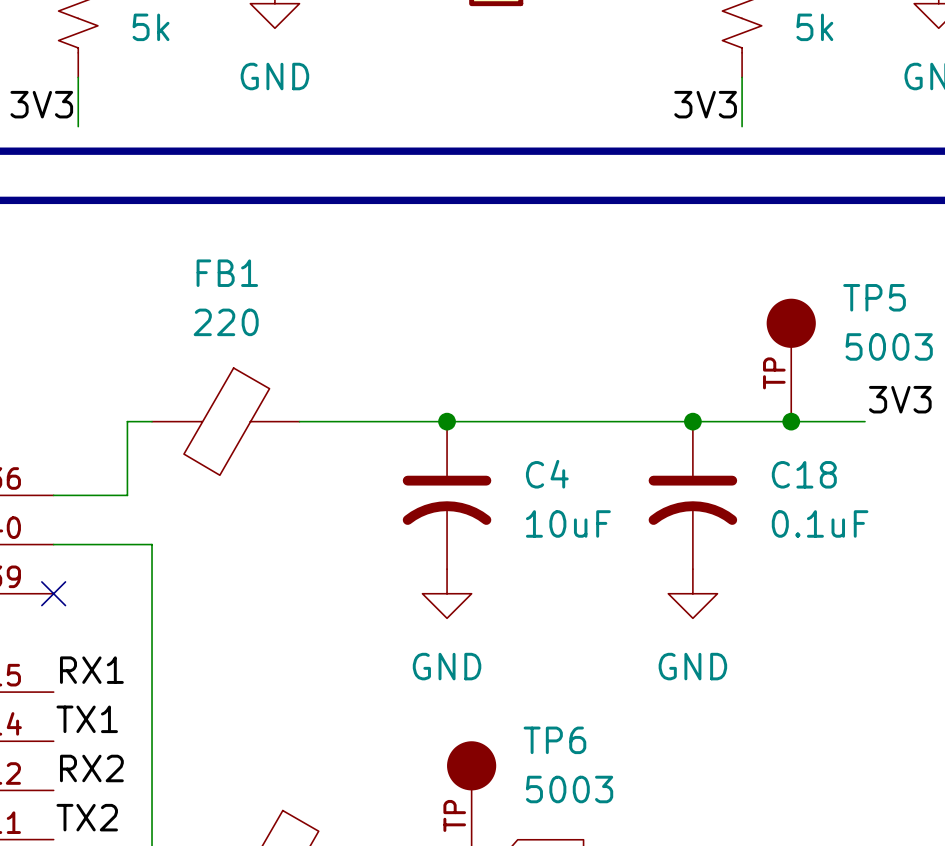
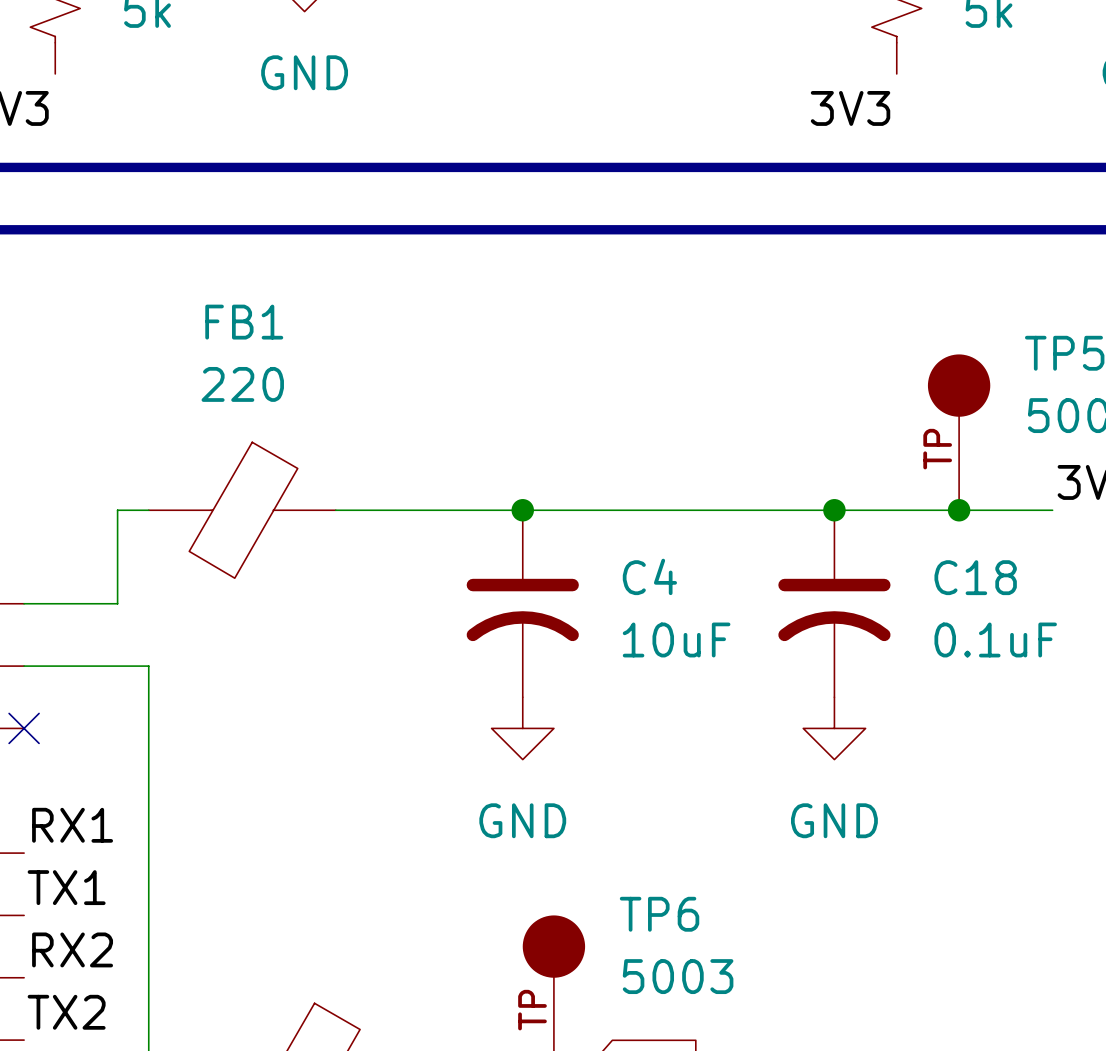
wire: (78, 77) (78, 126) -> none
wire: (742, 77) (742, 126) -> none

